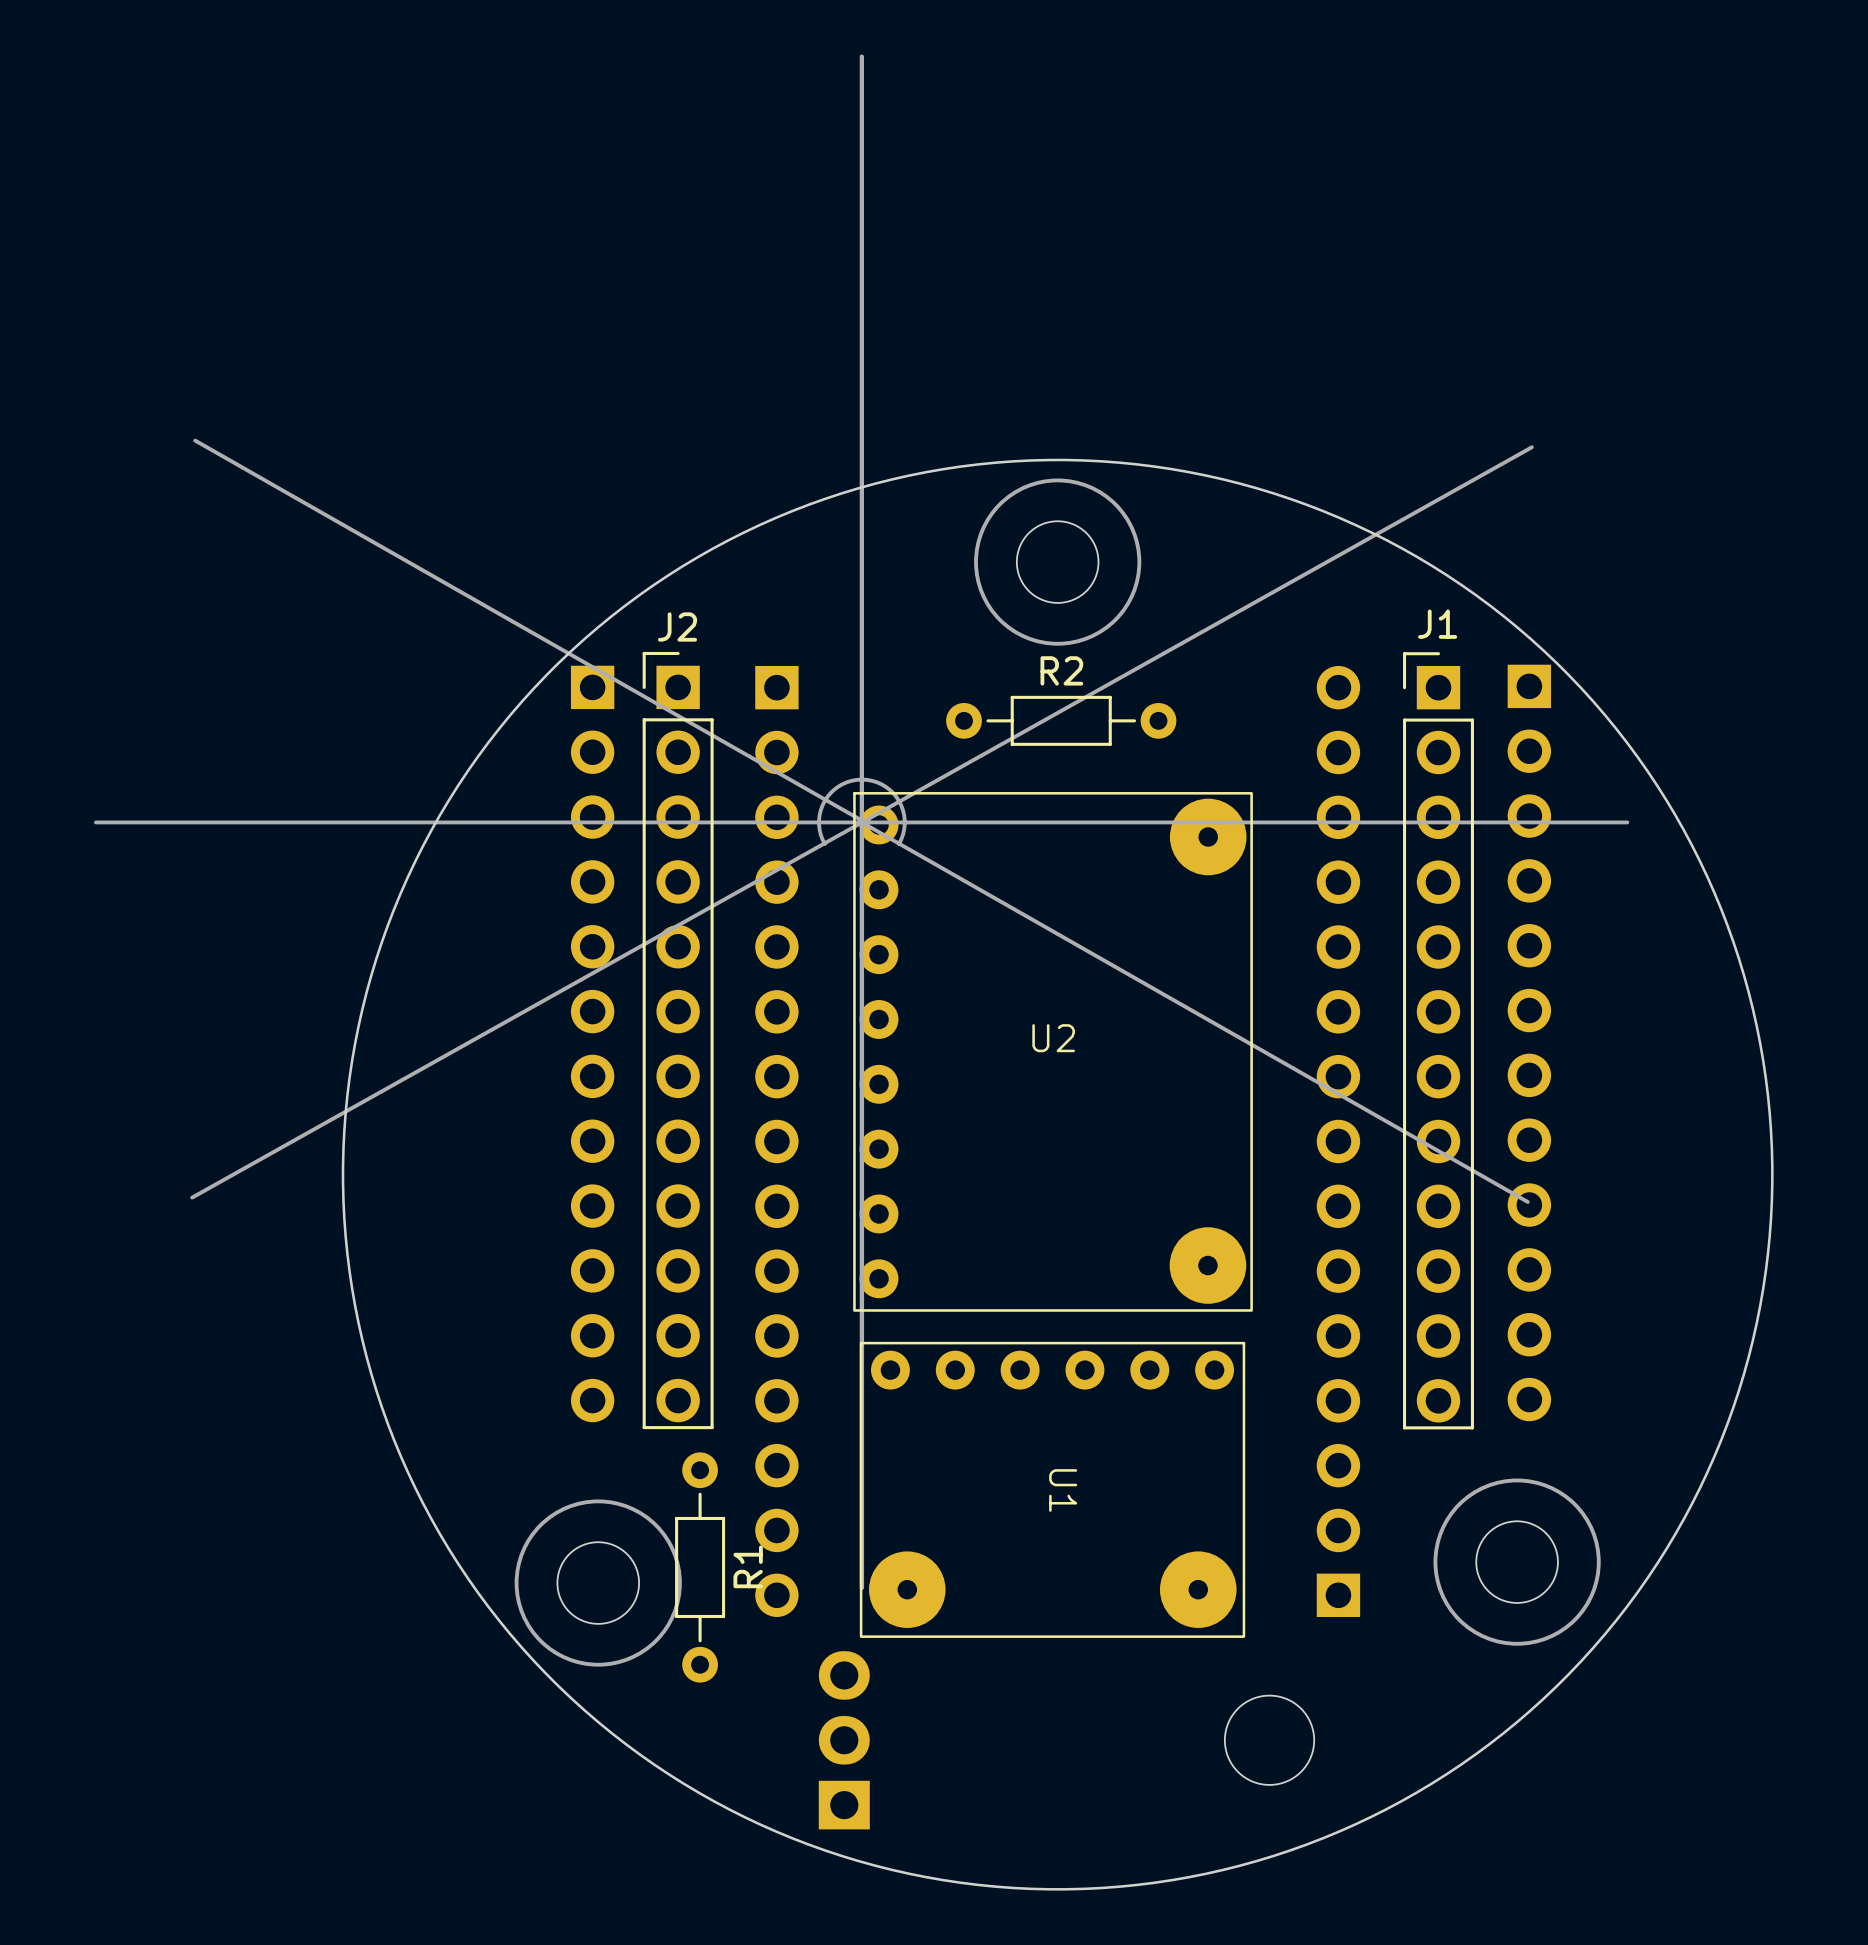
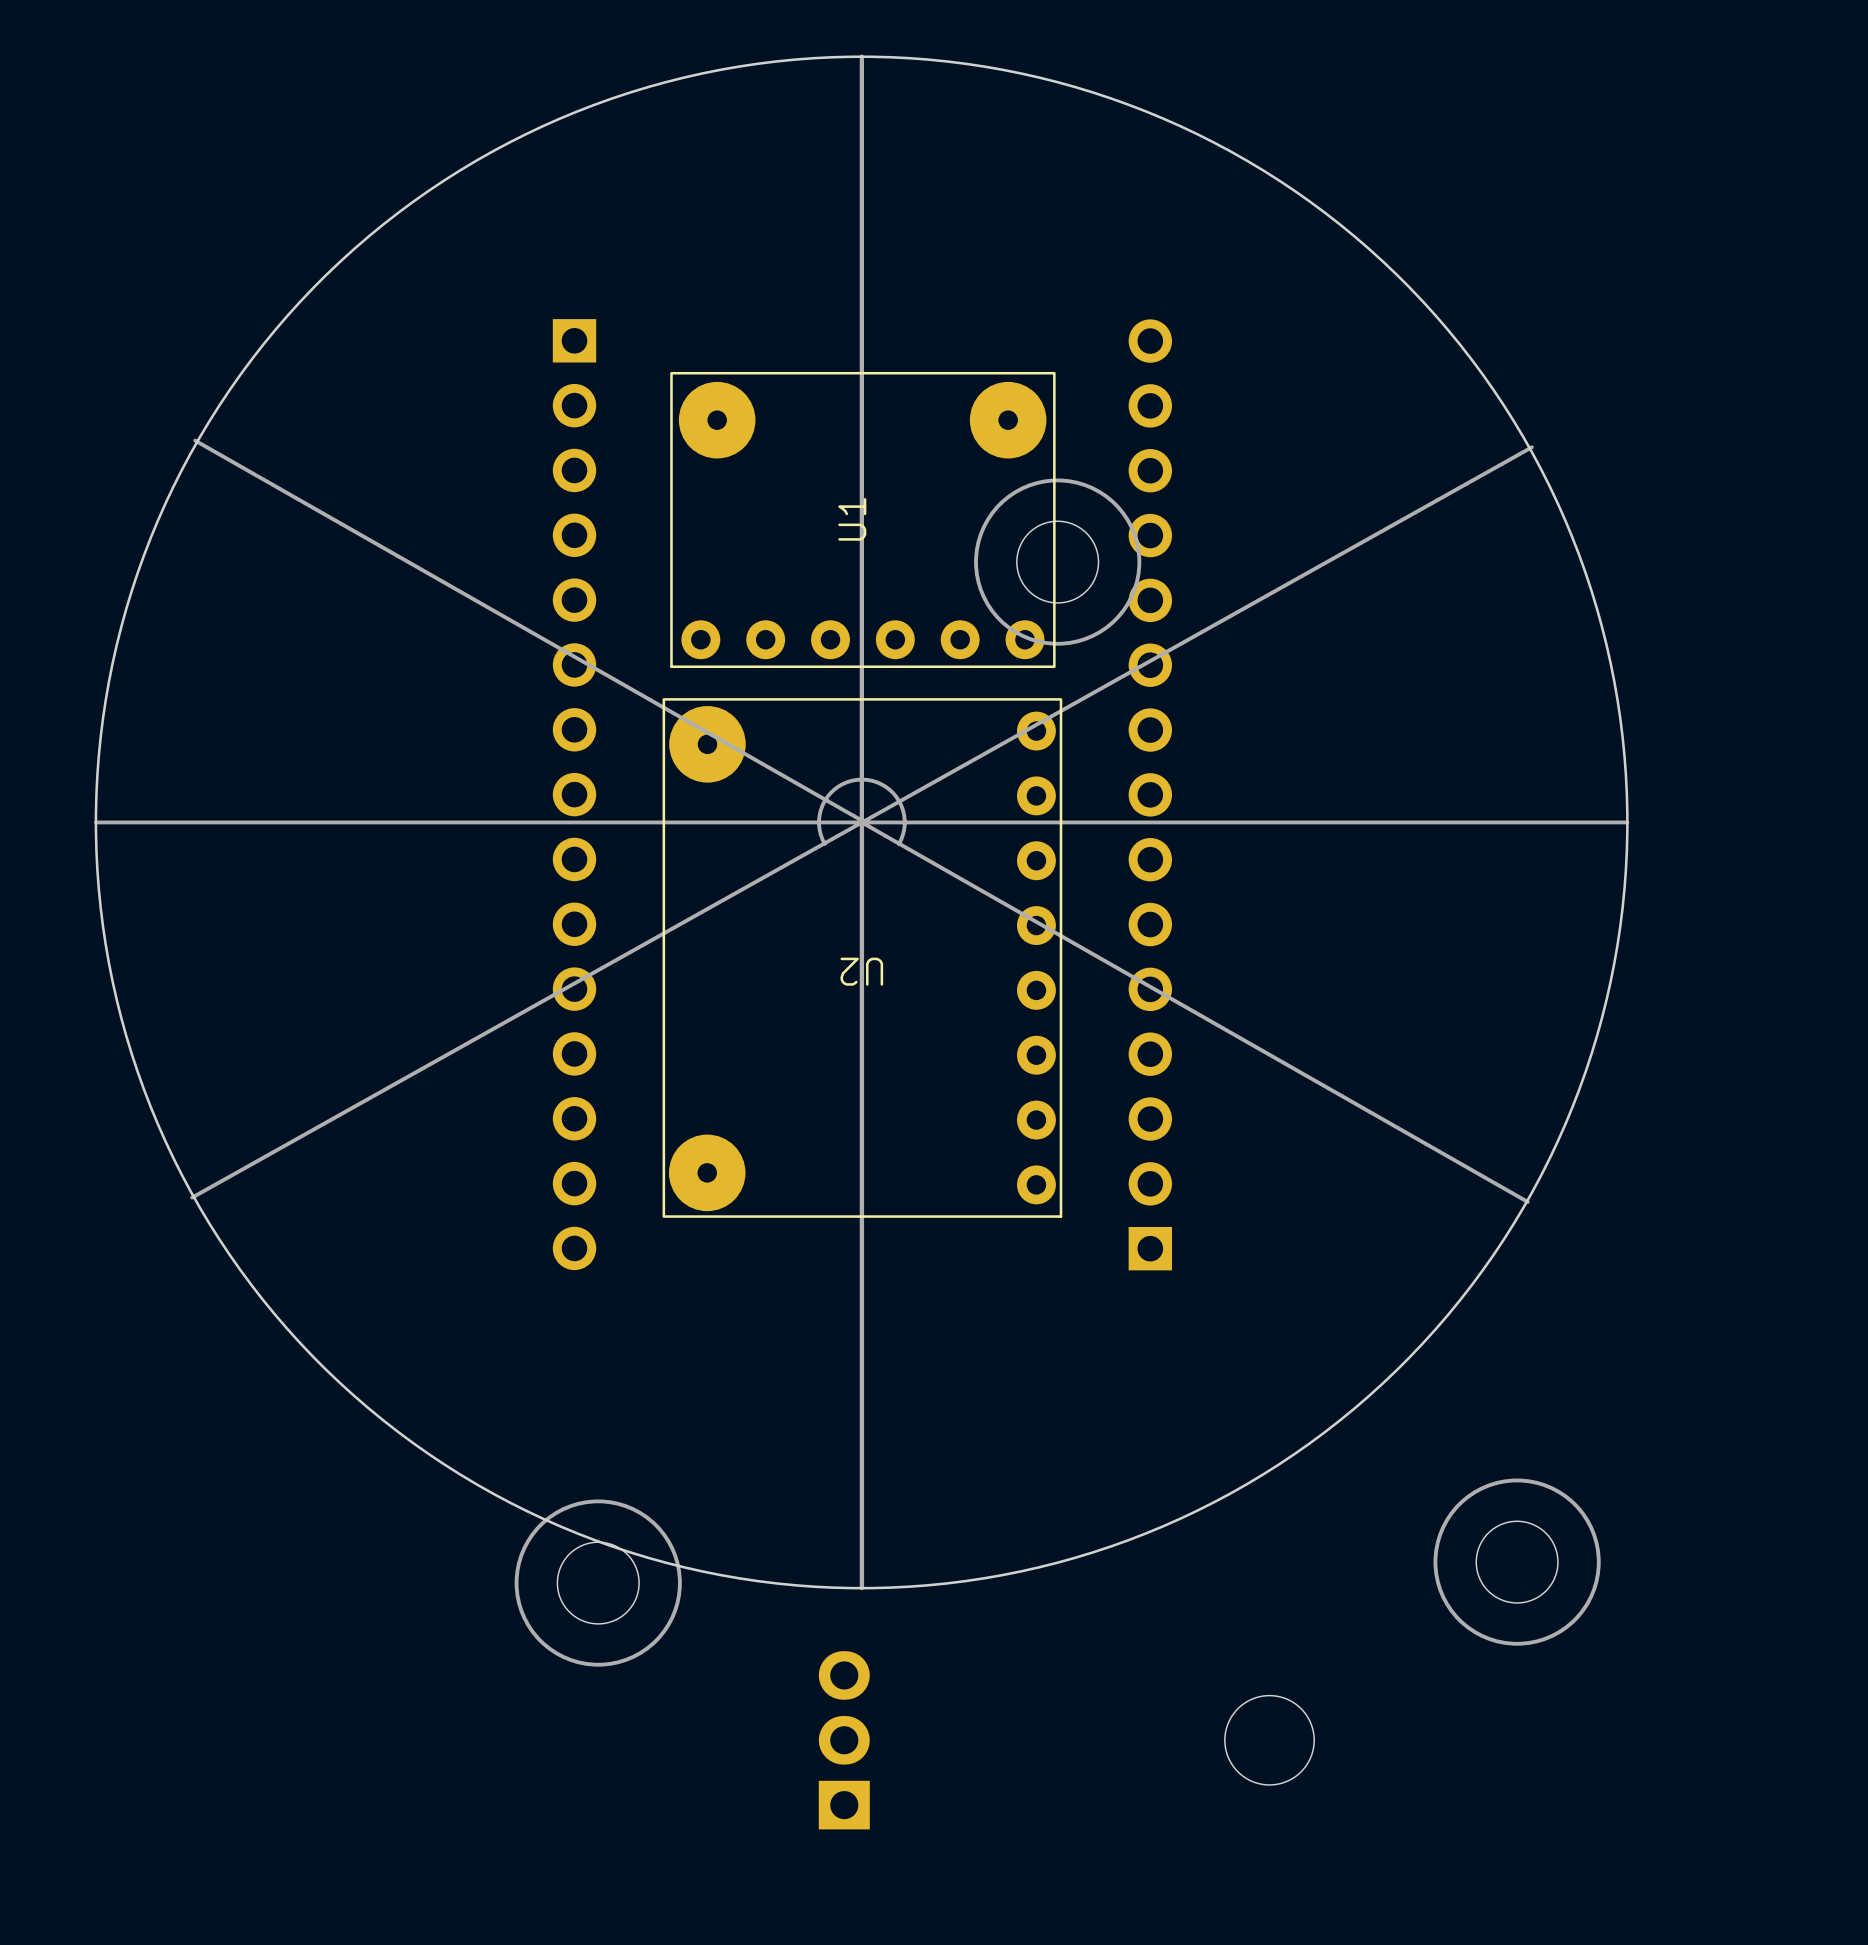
round board edge: none -> [94, 55, 1629, 1590]
part: none -> (717, 420)
part: none -> (1008, 420)
round board edge: [341, 458, 1774, 1891] -> none
part: (1529, 686) -> none
part: (592, 687) -> none
R2: (1061, 720) -> none
part: (1529, 751) -> none
part: (592, 752) -> none
part: none -> (574, 794)
part: none -> (1150, 794)
part: (1529, 816) -> none
part: (592, 817) -> none
part: (1529, 880) -> none
part: (592, 881) -> none
part: (1529, 945) -> none
part: (592, 946) -> none
part: (1529, 1010) -> none
part: (592, 1011) -> none
J2: (678, 1040) -> none
J1: (1438, 1040) -> none
U2 rotation: 0° (1053, 1051) -> 180° (862, 957)
part: (1529, 1075) -> none
part: (592, 1076) -> none
part: (1529, 1140) -> none
part: (592, 1141) -> none
part: (776, 1141) -> none
part: (1338, 1141) -> none
part: (1529, 1205) -> none
part: (592, 1206) -> none
part: (1529, 1269) -> none
part: (592, 1270) -> none
part: (1529, 1334) -> none
part: (592, 1335) -> none
part: (1529, 1399) -> none
part: (592, 1400) -> none
U1 rotation: 0° (1052, 1489) -> 180° (862, 519)
U1 position: (1052, 1489) -> (862, 519)
R1: (700, 1567) -> none
part: (907, 1589) -> none
part: (1198, 1589) -> none

